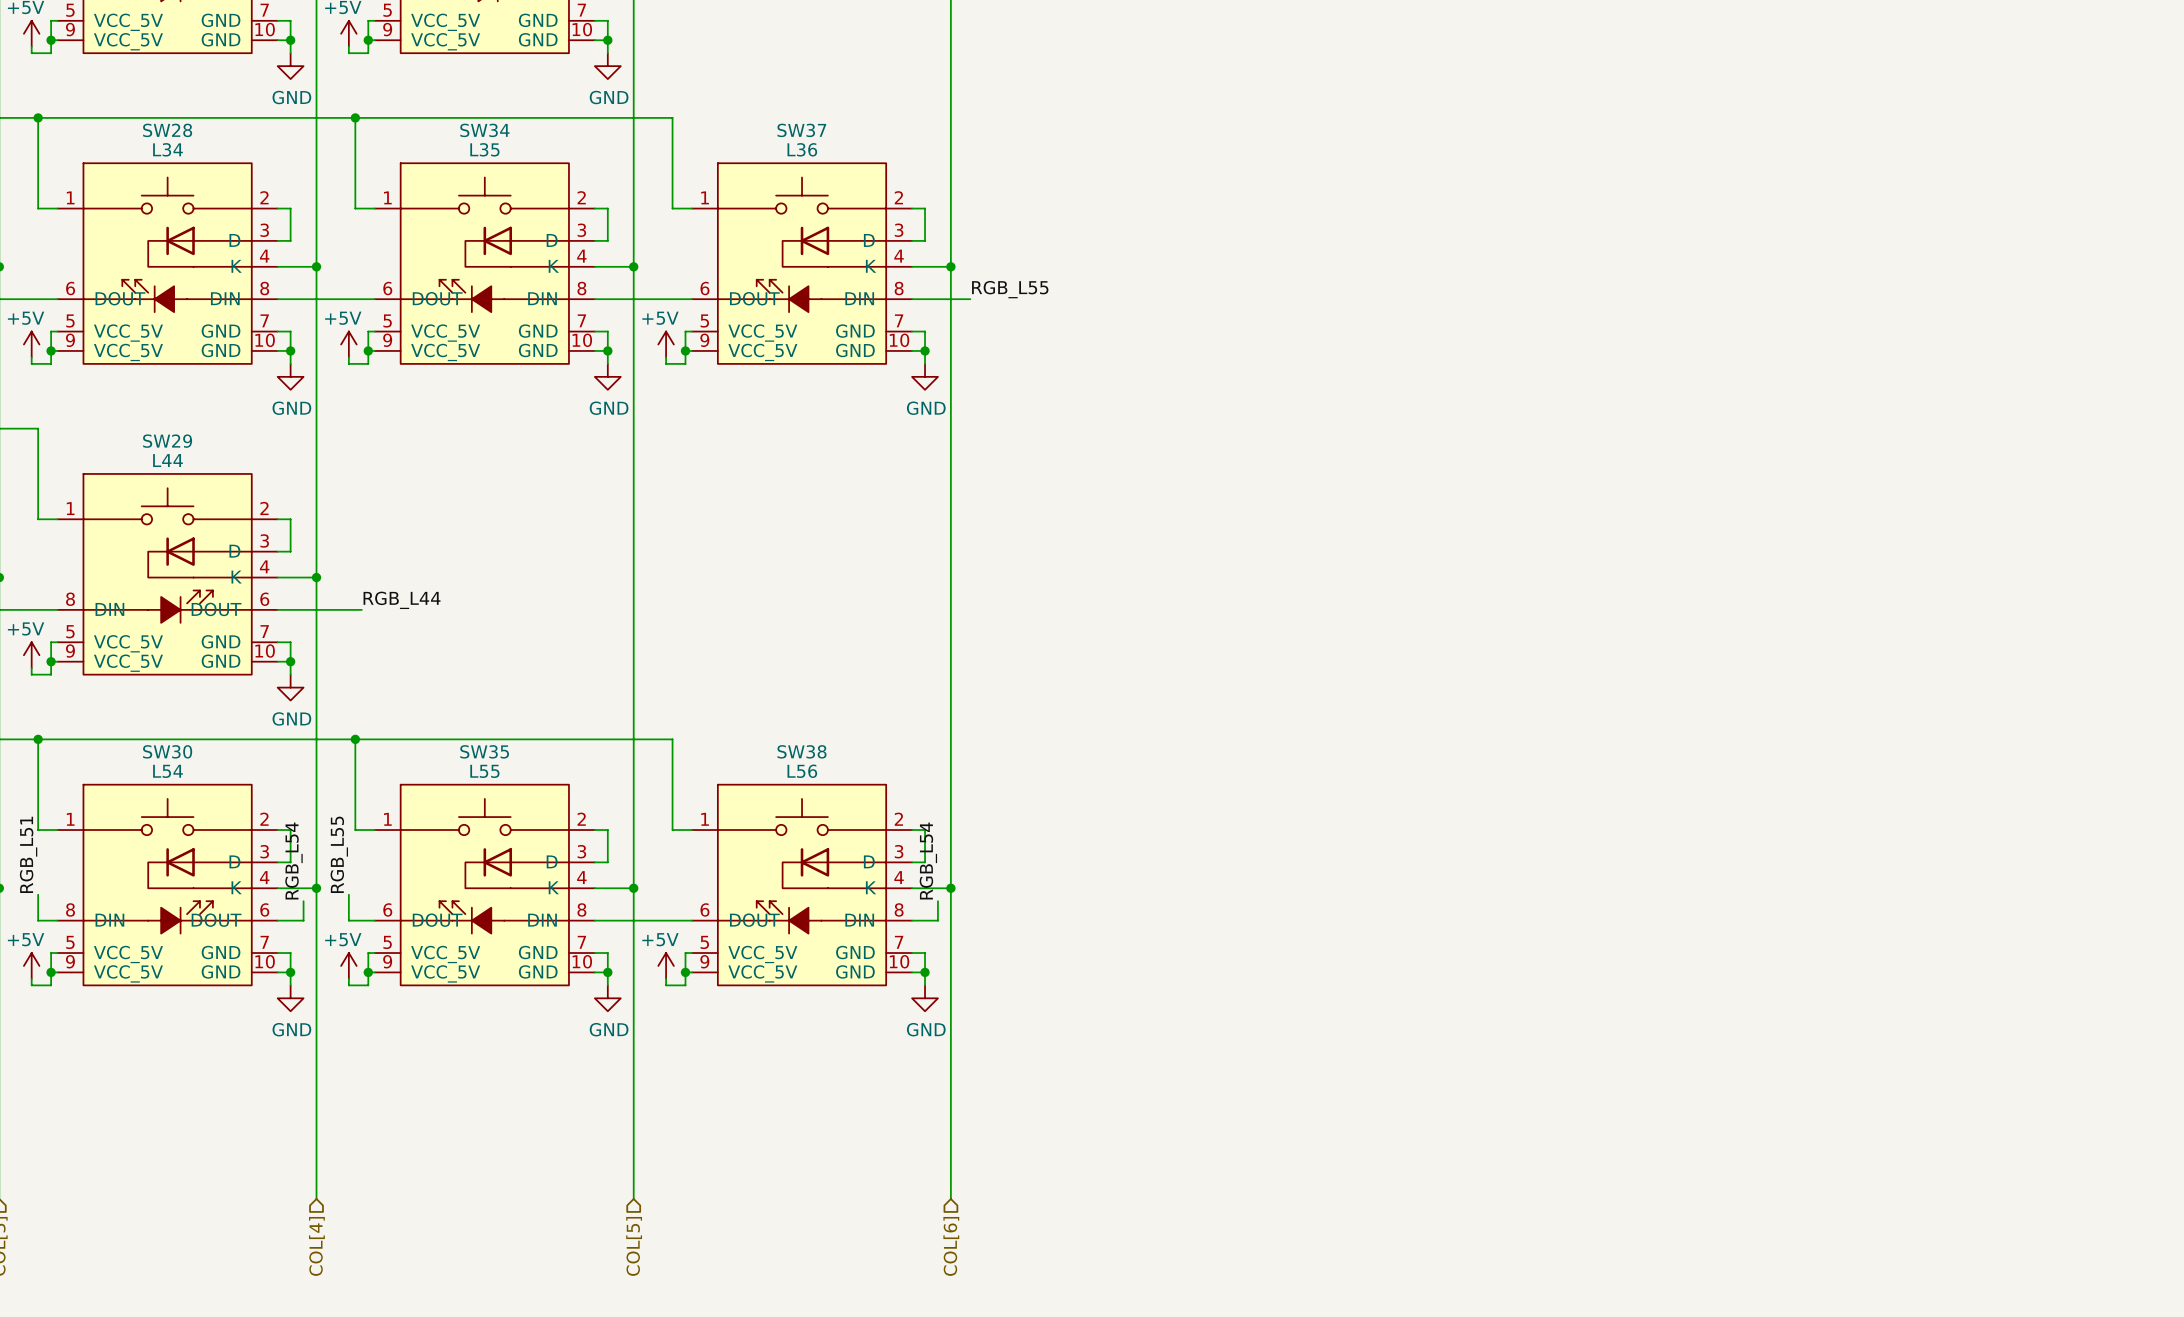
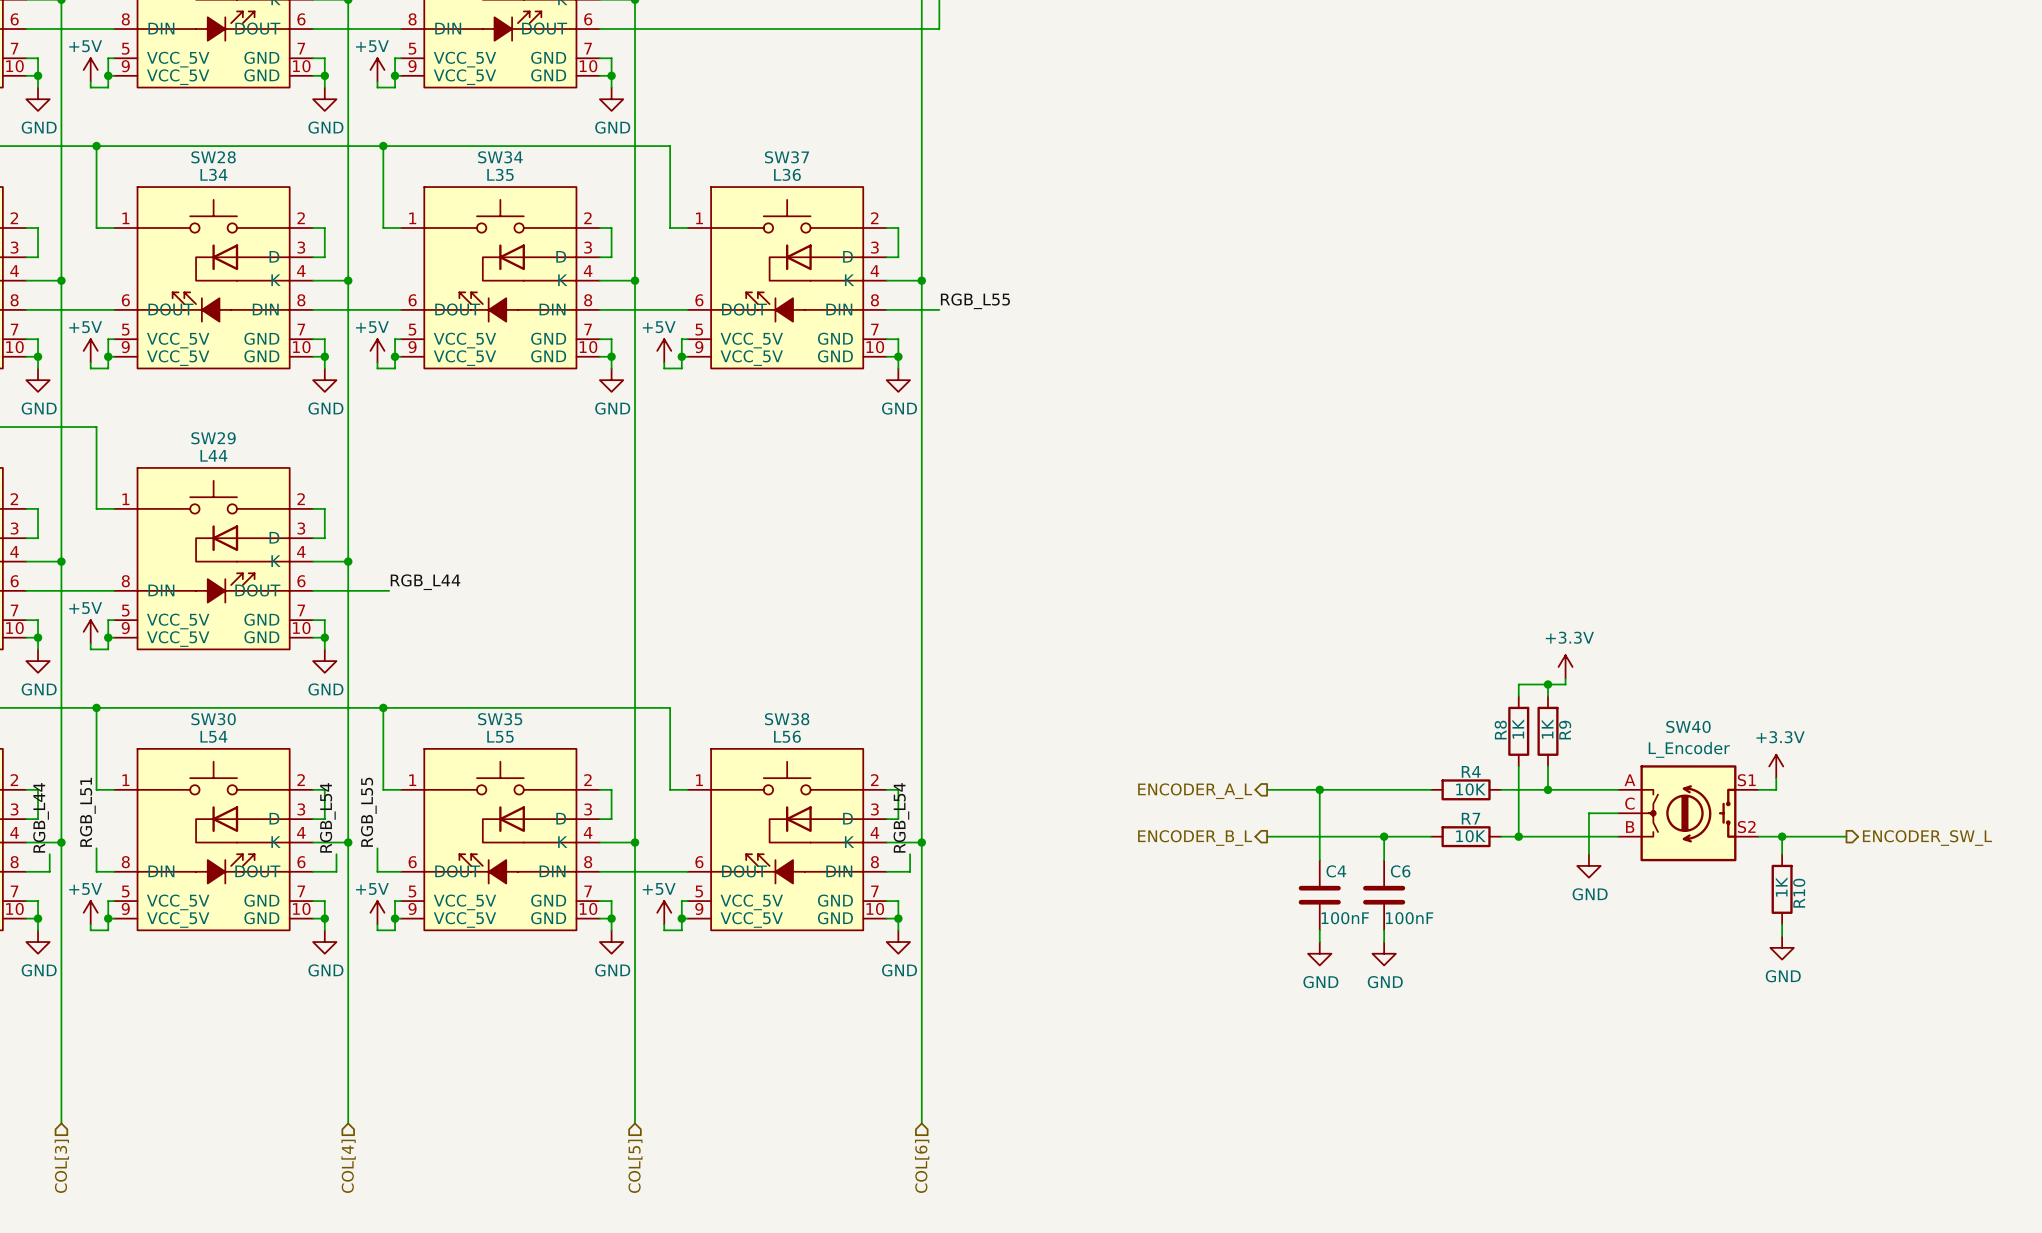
power symbol: none -> +3.3V (1565, 666)
wire: none -> (1565, 678) (1565, 684) (1518, 684) (1518, 696)
wire: none -> (1548, 684) (1548, 696)
junction: none -> (1548, 684)
R8: none -> 1K (1518, 731)
R9: none -> 1K (1548, 731)
wire: none -> (1518, 766) (1518, 836)
wire: none -> (1548, 766) (1548, 789)
power symbol: none -> +3.3V (1776, 766)
wire: none -> (1776, 778) (1776, 789) (1758, 789)
wire: none -> (1267, 789) (1430, 789)
wire: none -> (1319, 789) (1319, 860)
junction: none -> (1319, 789)
R4: none -> 10K (1466, 789)
wire: none -> (1501, 789) (1618, 789)
junction: none -> (1548, 789)
hierarchical label: none -> ENCODER_A_L (1195, 791)
wire: none -> (1618, 813) (1588, 813) (1588, 854)
SW40: none -> L_Encoder (1688, 813)
wire: none -> (1267, 836) (1430, 836)
wire: none -> (1384, 836) (1384, 860)
junction: none -> (1384, 836)
R7: none -> 10K (1466, 836)
wire: none -> (1501, 836) (1618, 836)
junction: none -> (1518, 836)
wire: none -> (1758, 836) (1846, 836)
wire: none -> (1782, 836) (1782, 854)
junction: none -> (1782, 836)
hierarchical label: none -> ENCODER_B_L (1195, 838)
hierarchical label: none -> ENCODER_SW_L (1927, 838)
power symbol: none -> GND (1588, 865)
R10: none -> 1K (1782, 889)
C4: none -> 100nF (1319, 895)
C6: none -> 100nF (1384, 895)
wire: none -> (1782, 924) (1782, 936)
wire: none -> (1319, 930) (1319, 942)
wire: none -> (1384, 930) (1384, 942)
power symbol: none -> GND (1782, 947)
power symbol: none -> GND (1319, 953)
power symbol: none -> GND (1384, 953)

